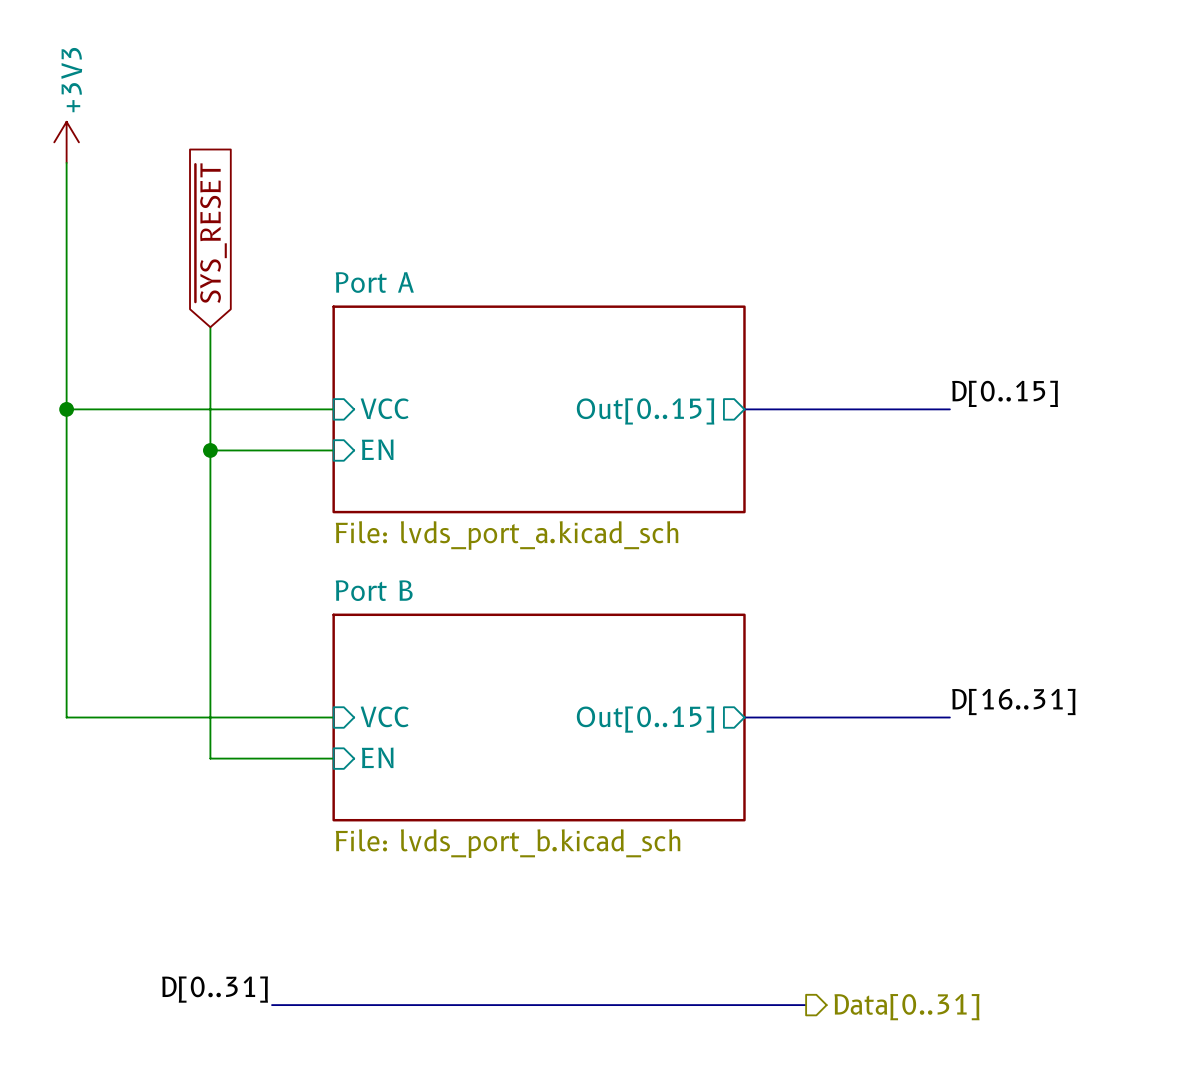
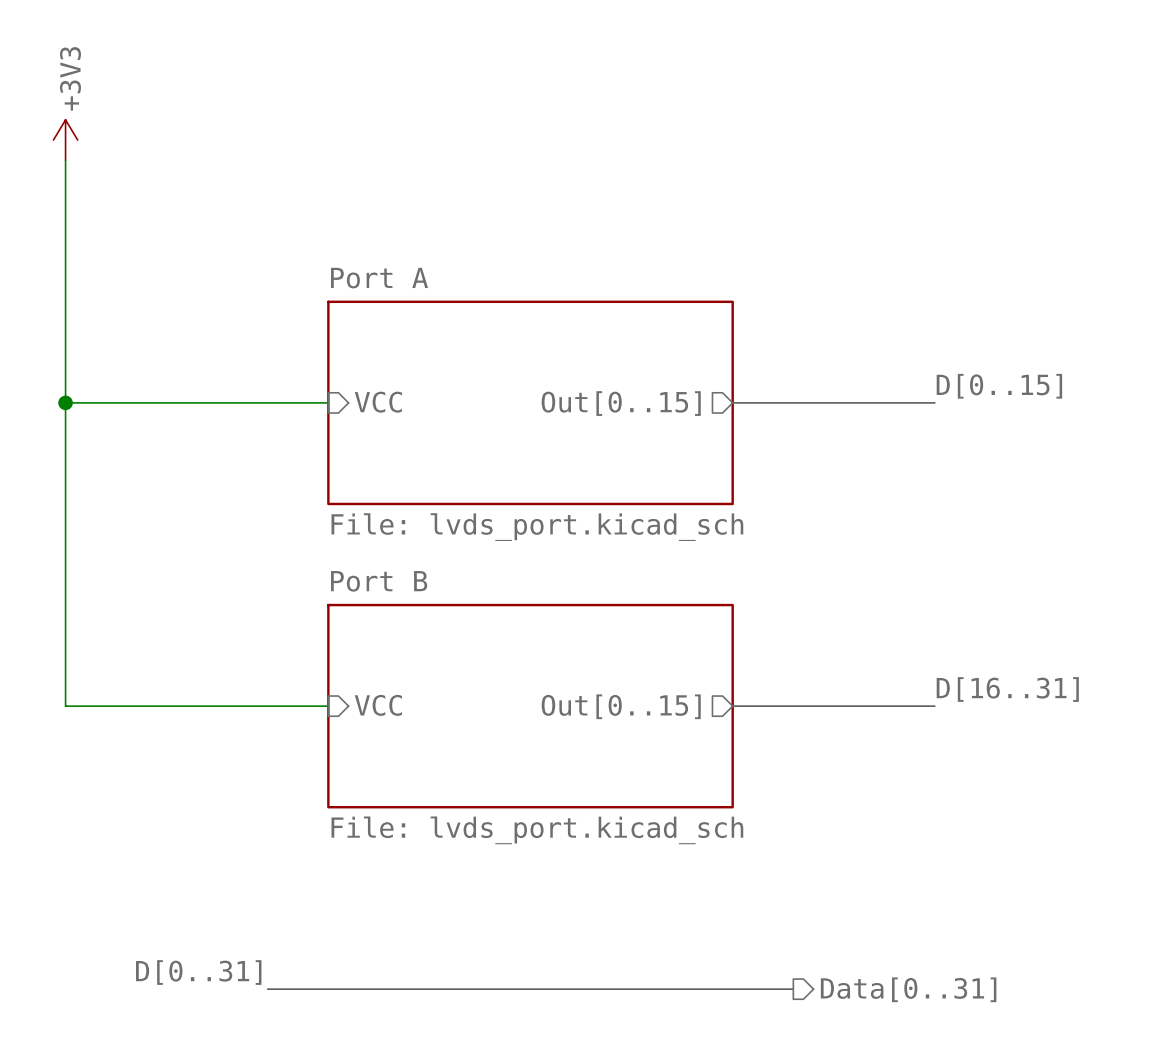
global label: ~{SYS_RESET} (211, 233) -> none
wire: (210, 327) (210, 758) (333, 758) -> none
sheet pin: EN (377, 449) -> none
wire: (210, 450) (333, 450) -> none
junction: (210, 450) -> none
sheet Port A value: File: lvds_port_a.kicad_sch (507, 535) -> File: lvds_port.kicad_sch (537, 527)
sheet pin: EN (377, 757) -> none
sheet Port B value: File: lvds_port_b.kicad_sch (508, 843) -> File: lvds_port.kicad_sch (537, 830)

